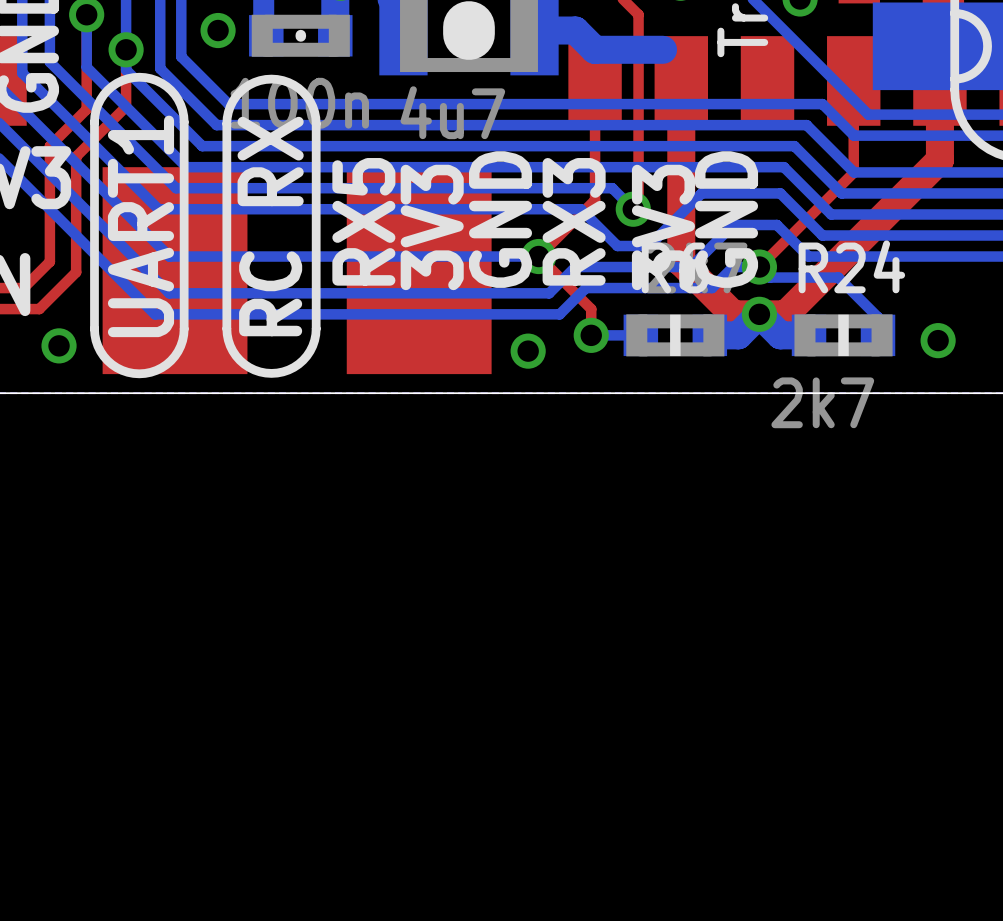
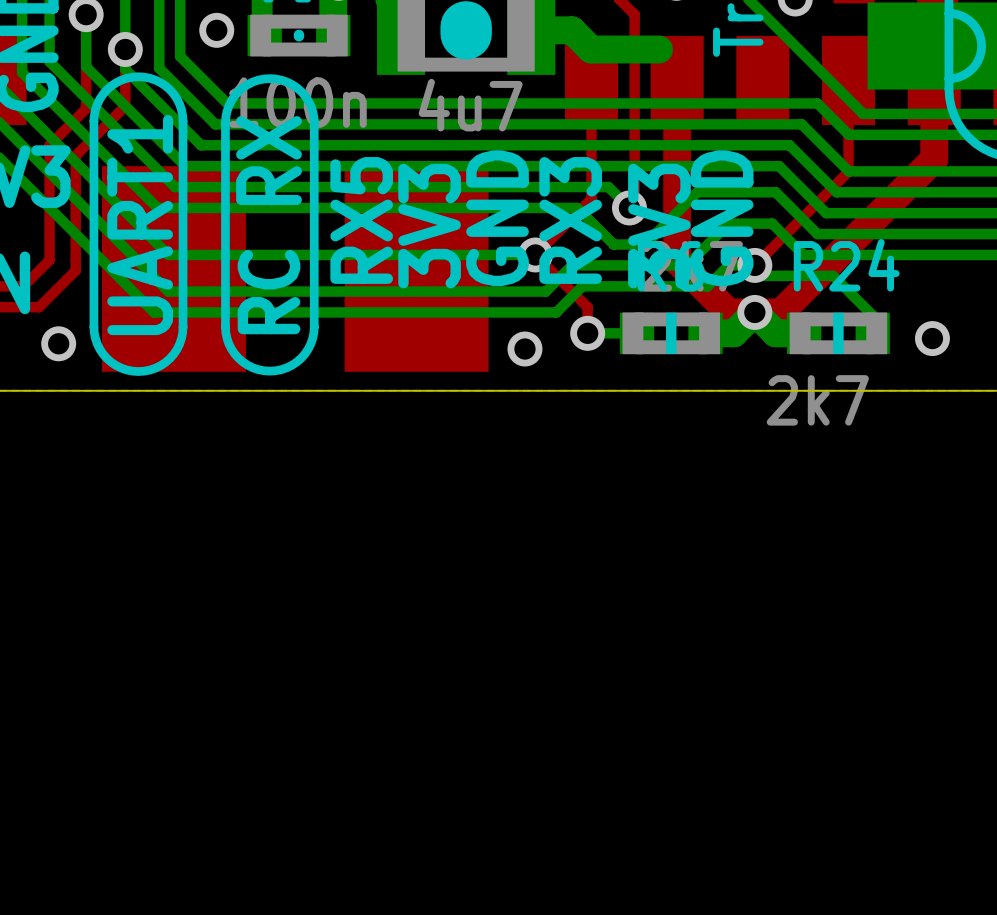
part value position: 4u7 (452, 112) -> 4u7 (470, 105)

